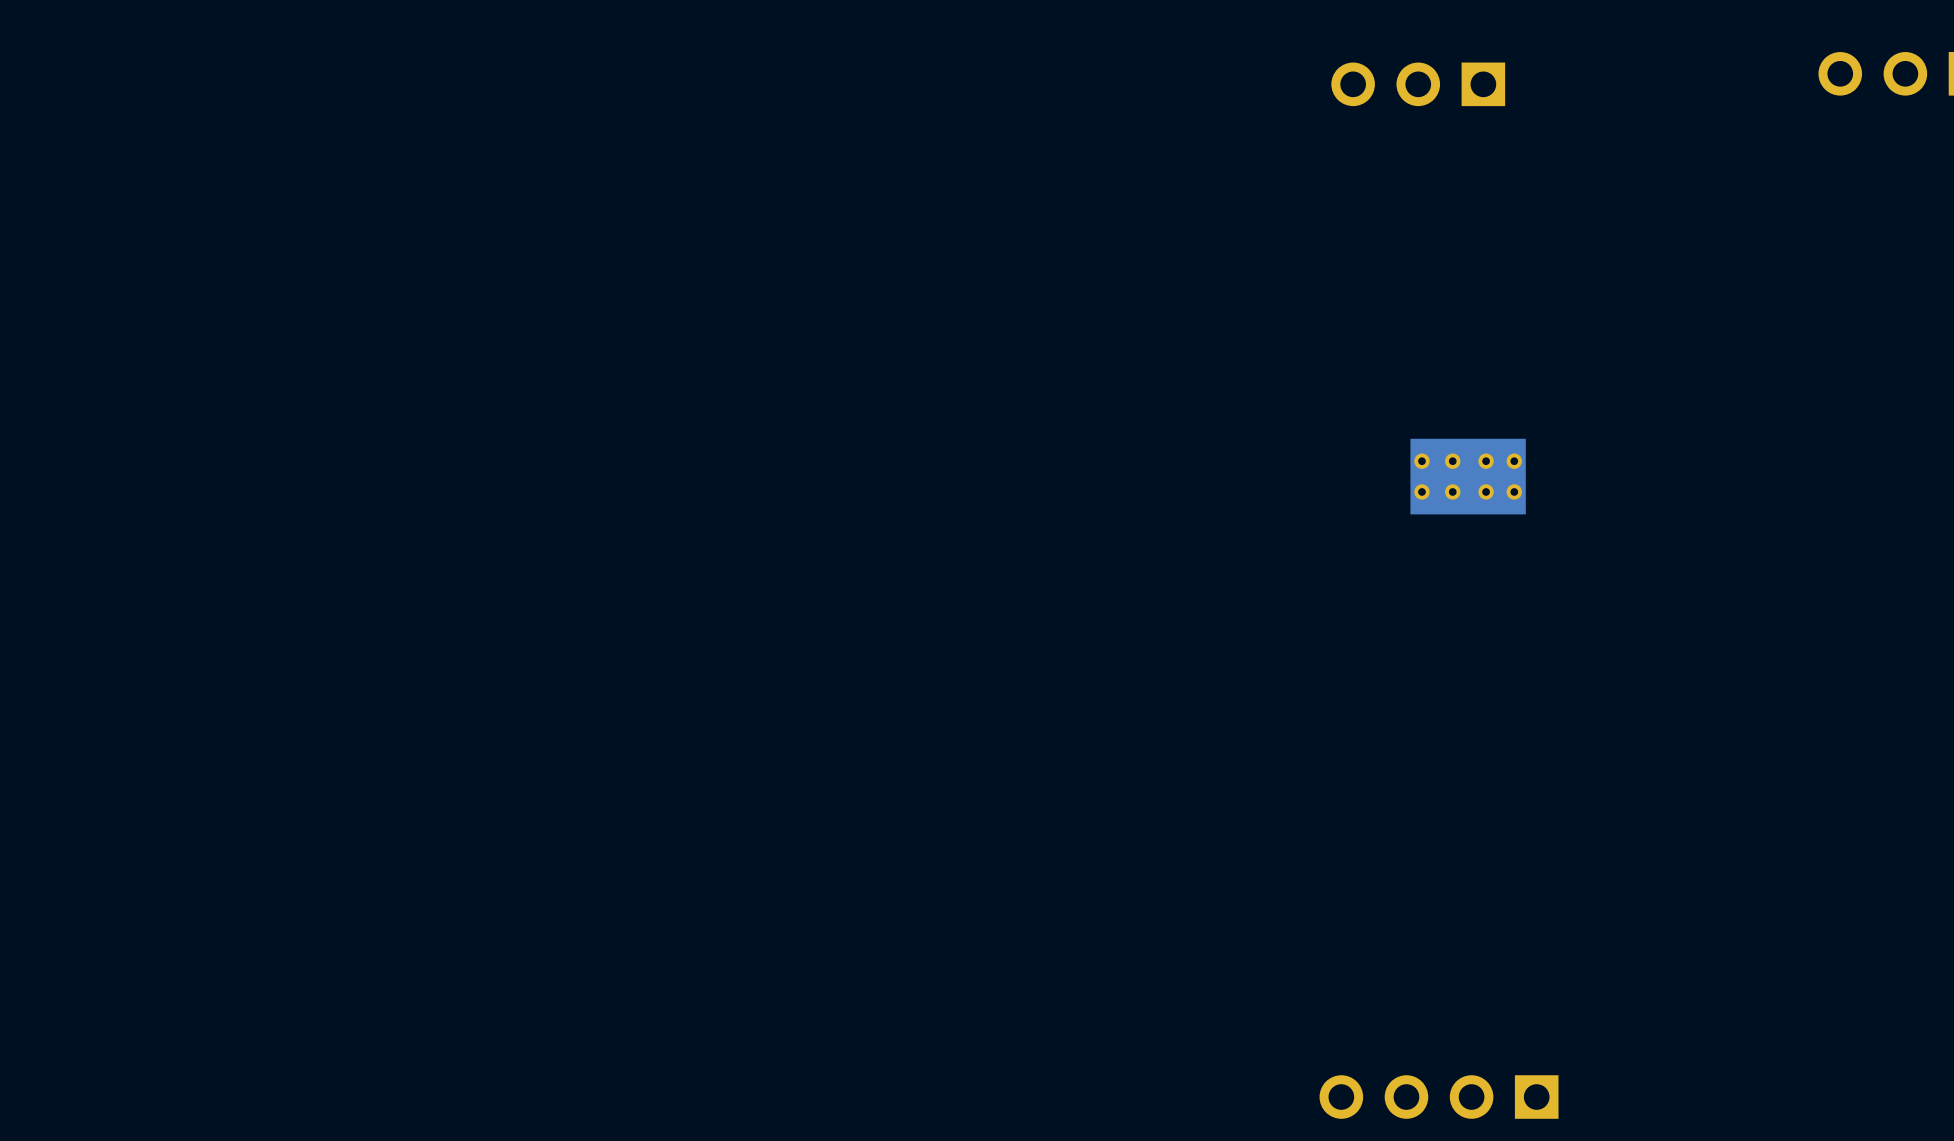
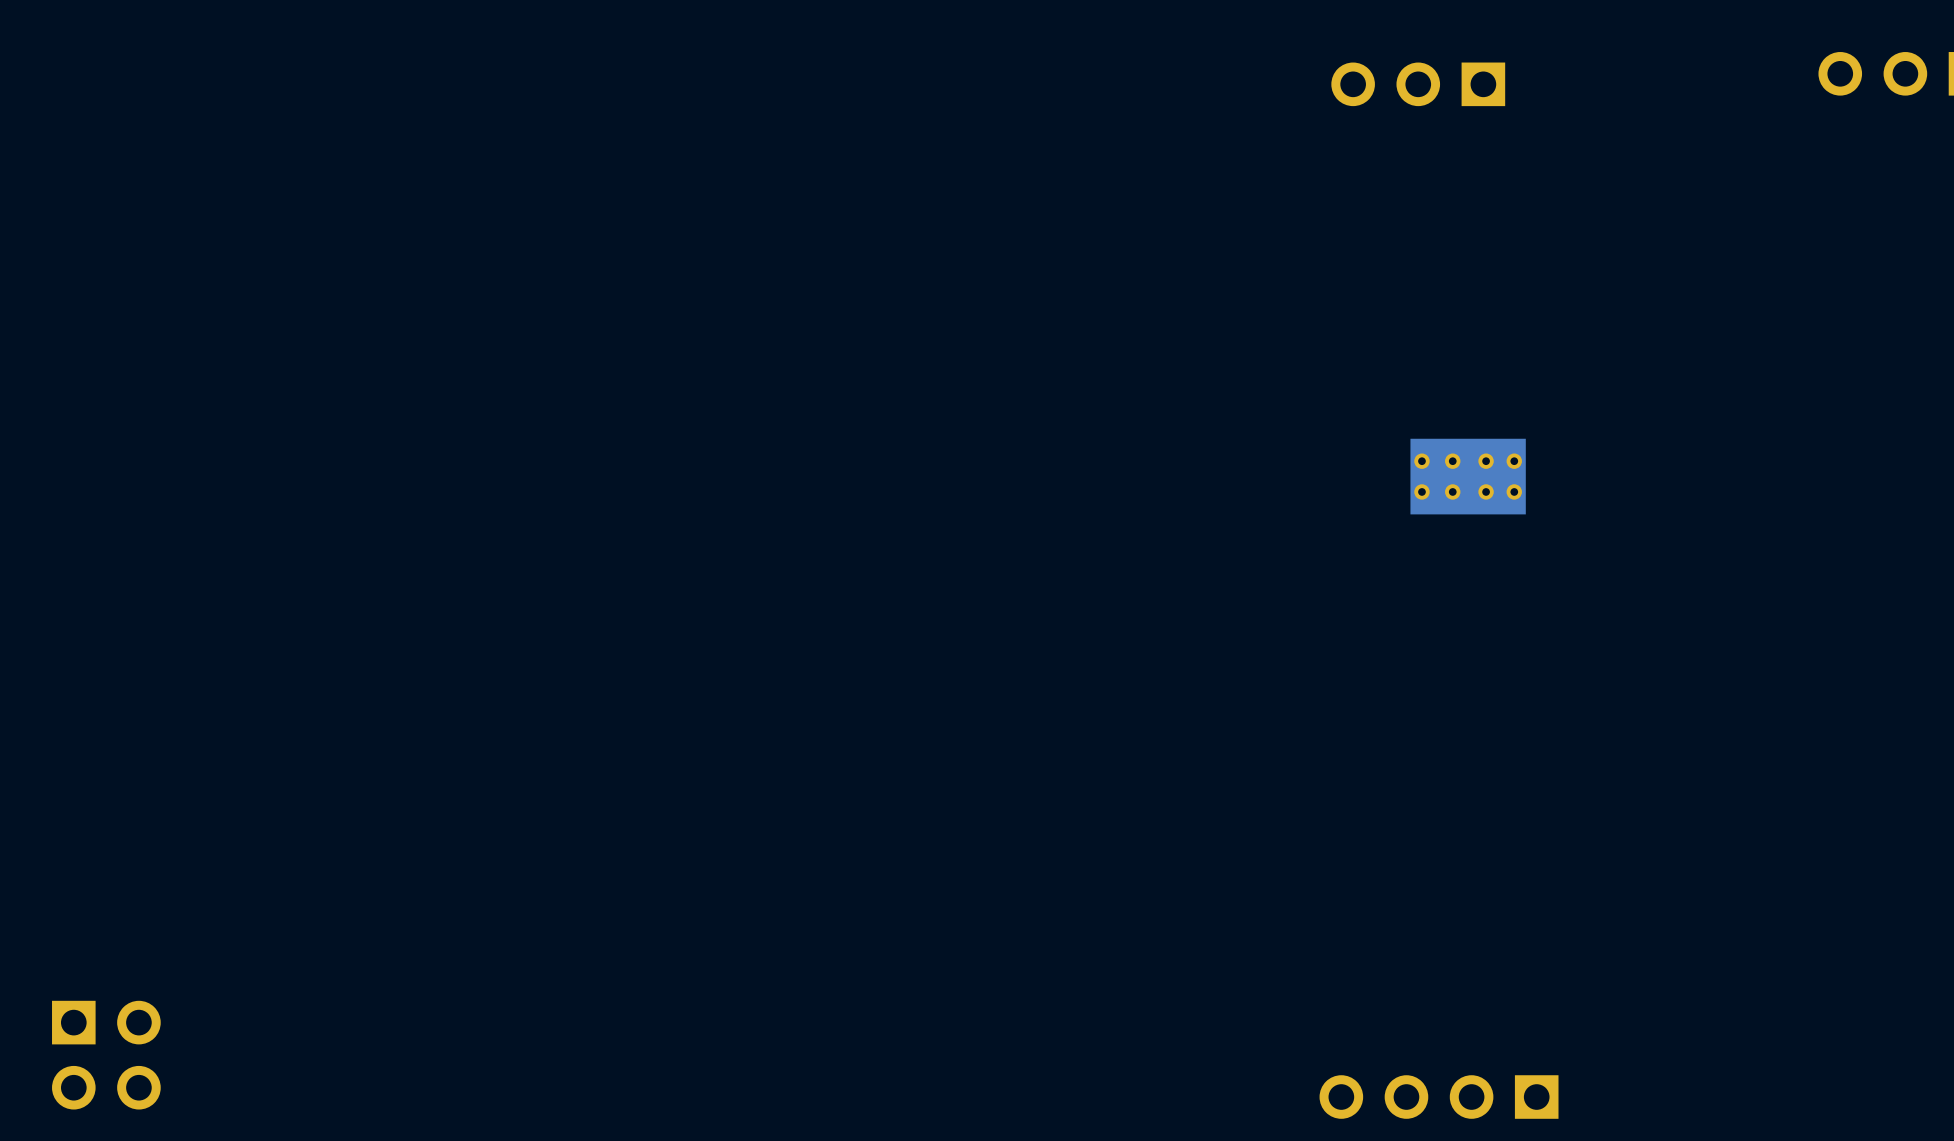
part: none -> (106, 1055)

